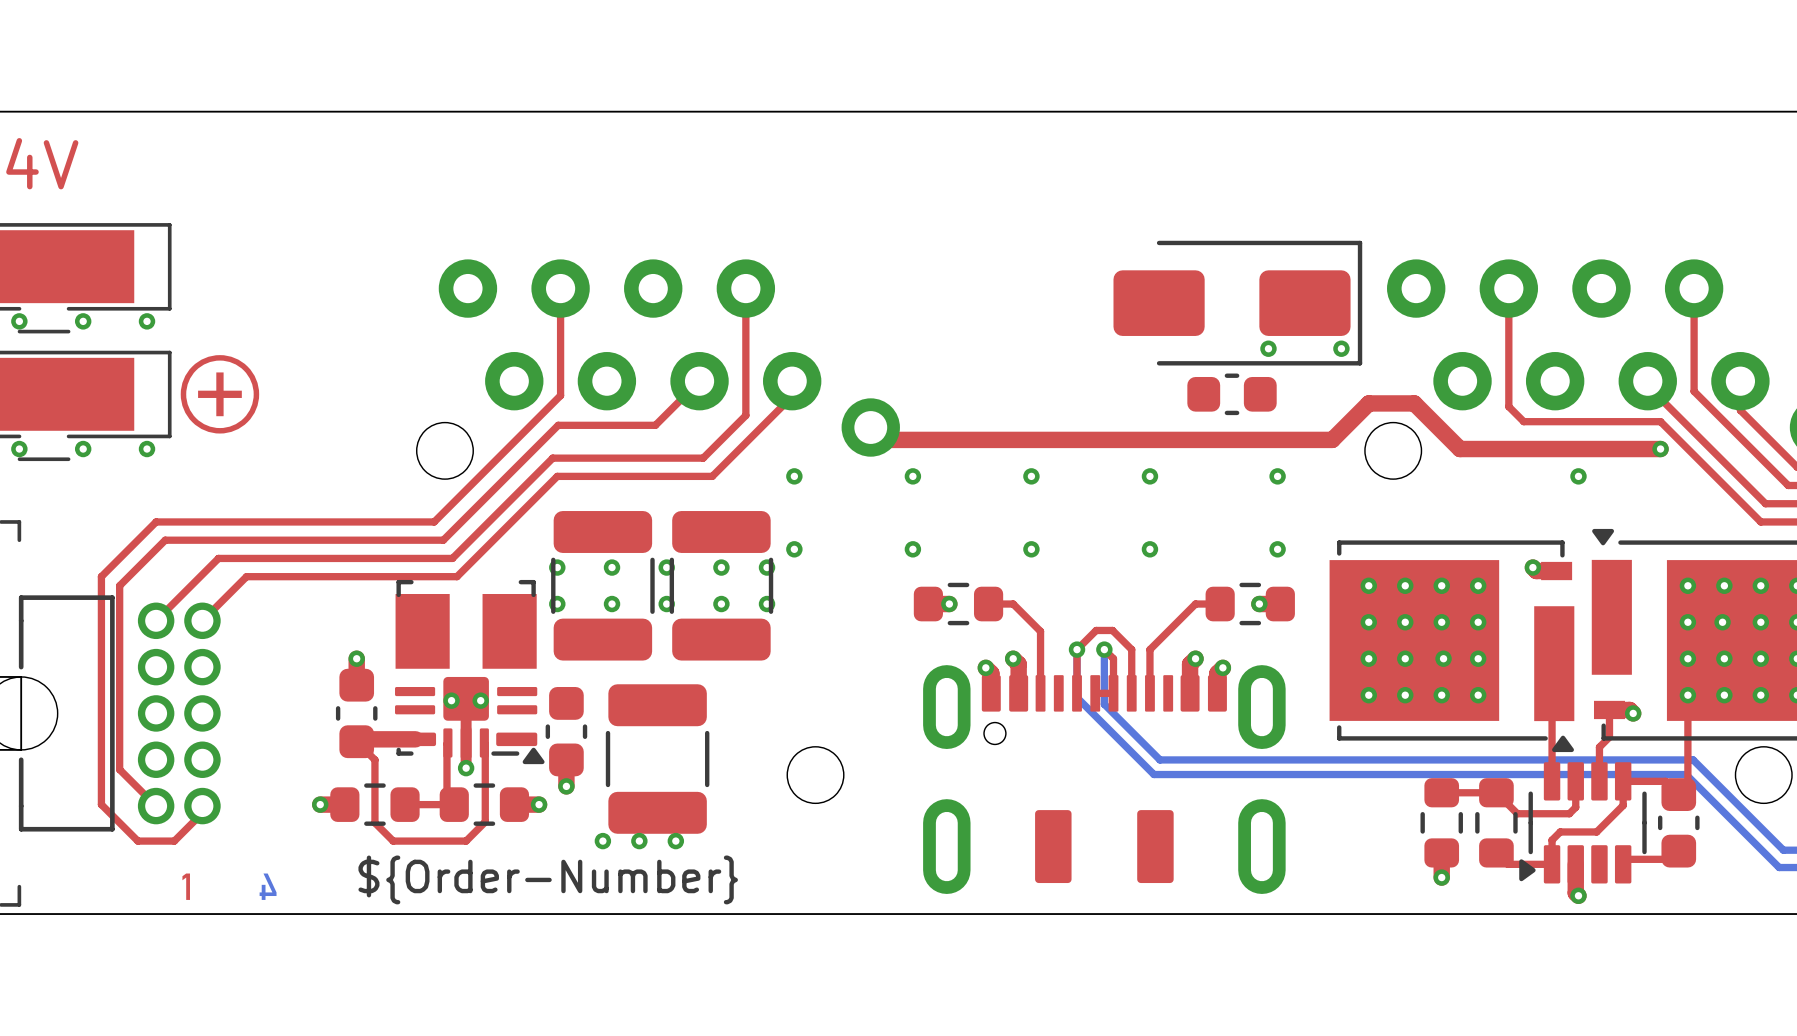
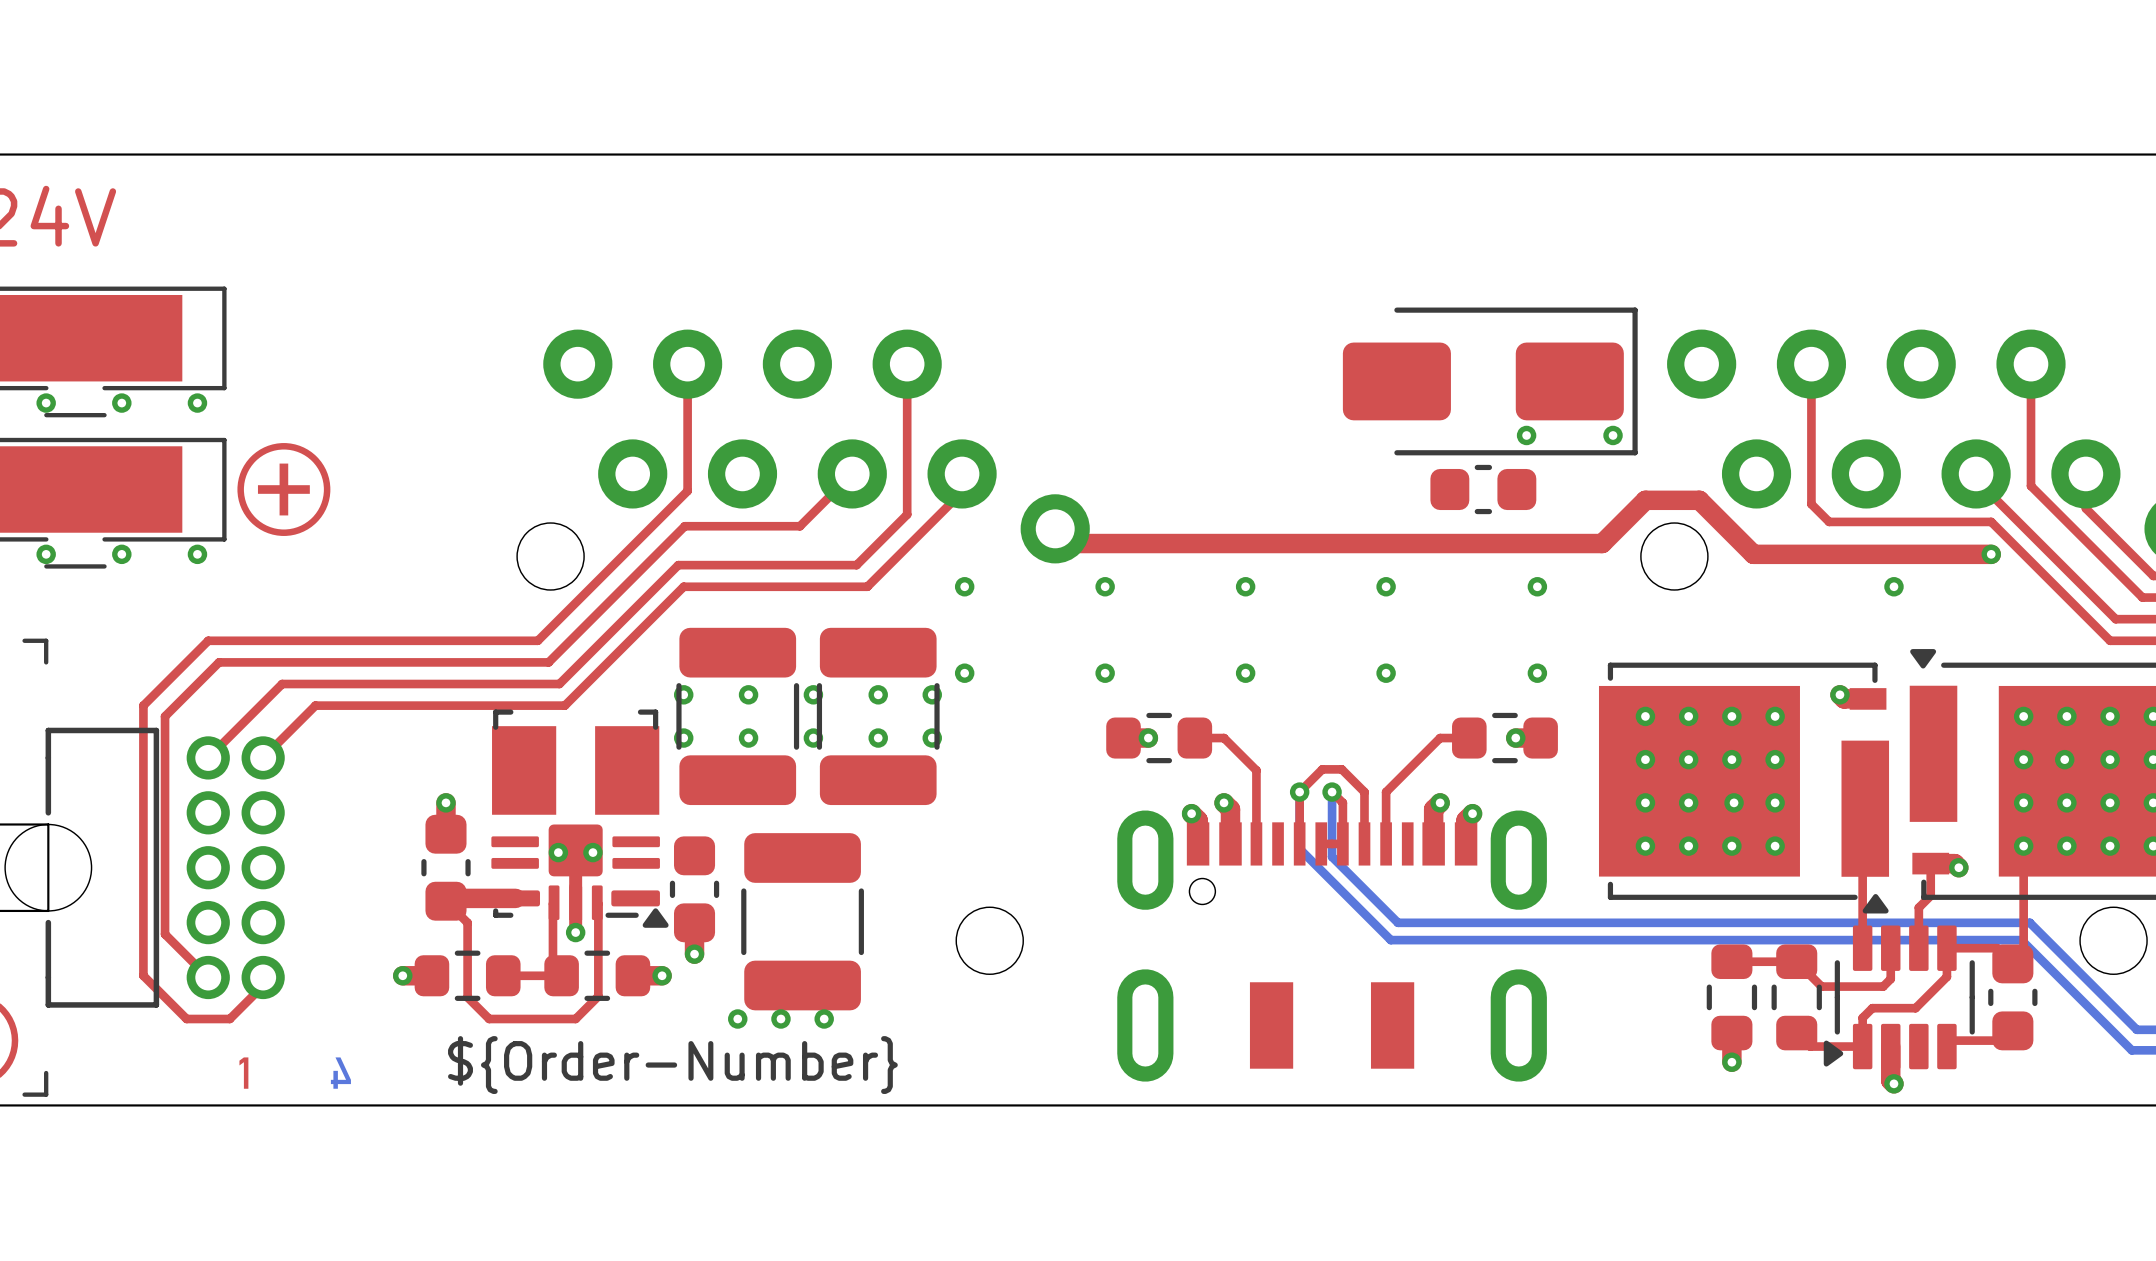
part footprint: [923, 665, 1286, 894] -> [1117, 810, 1547, 1082]

